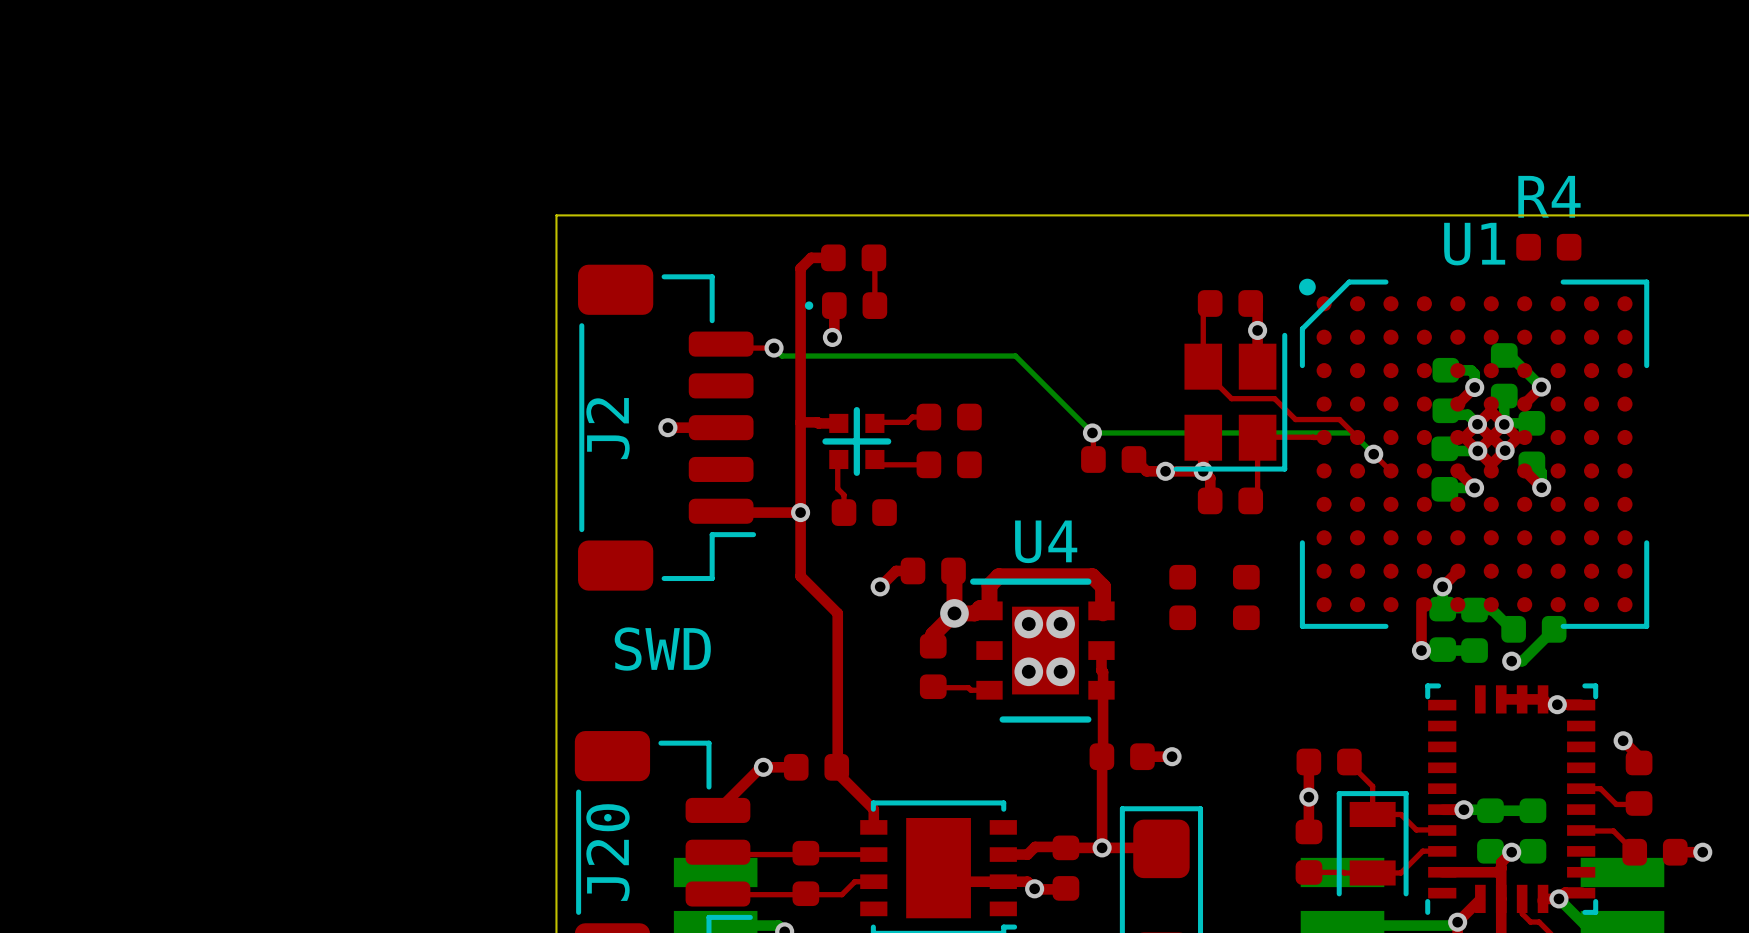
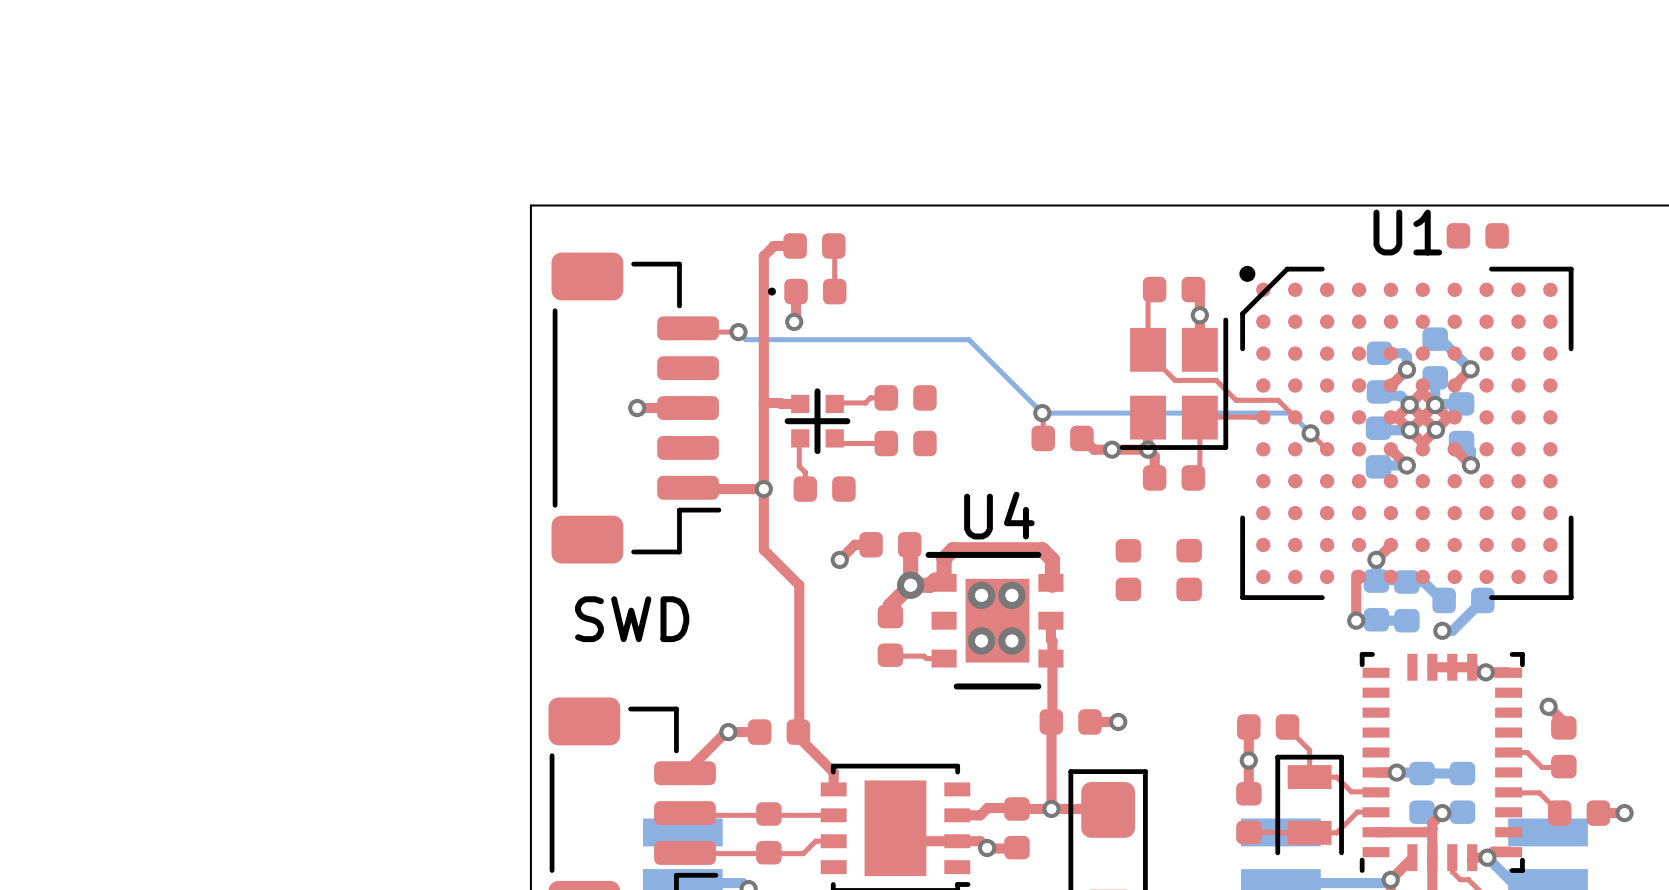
R4 name: R4 (1549, 196) -> none
J2 name: J2 (608, 428) -> none
J20 name: J20 (608, 852) -> none

